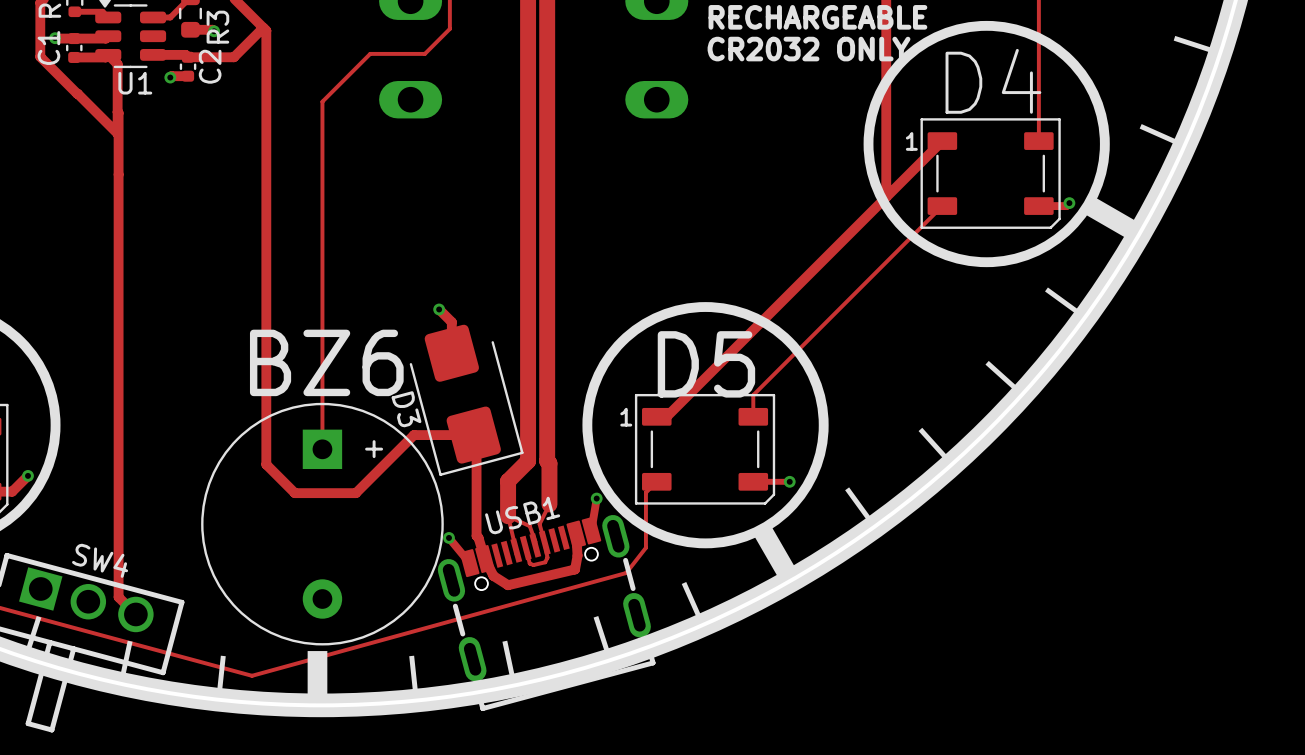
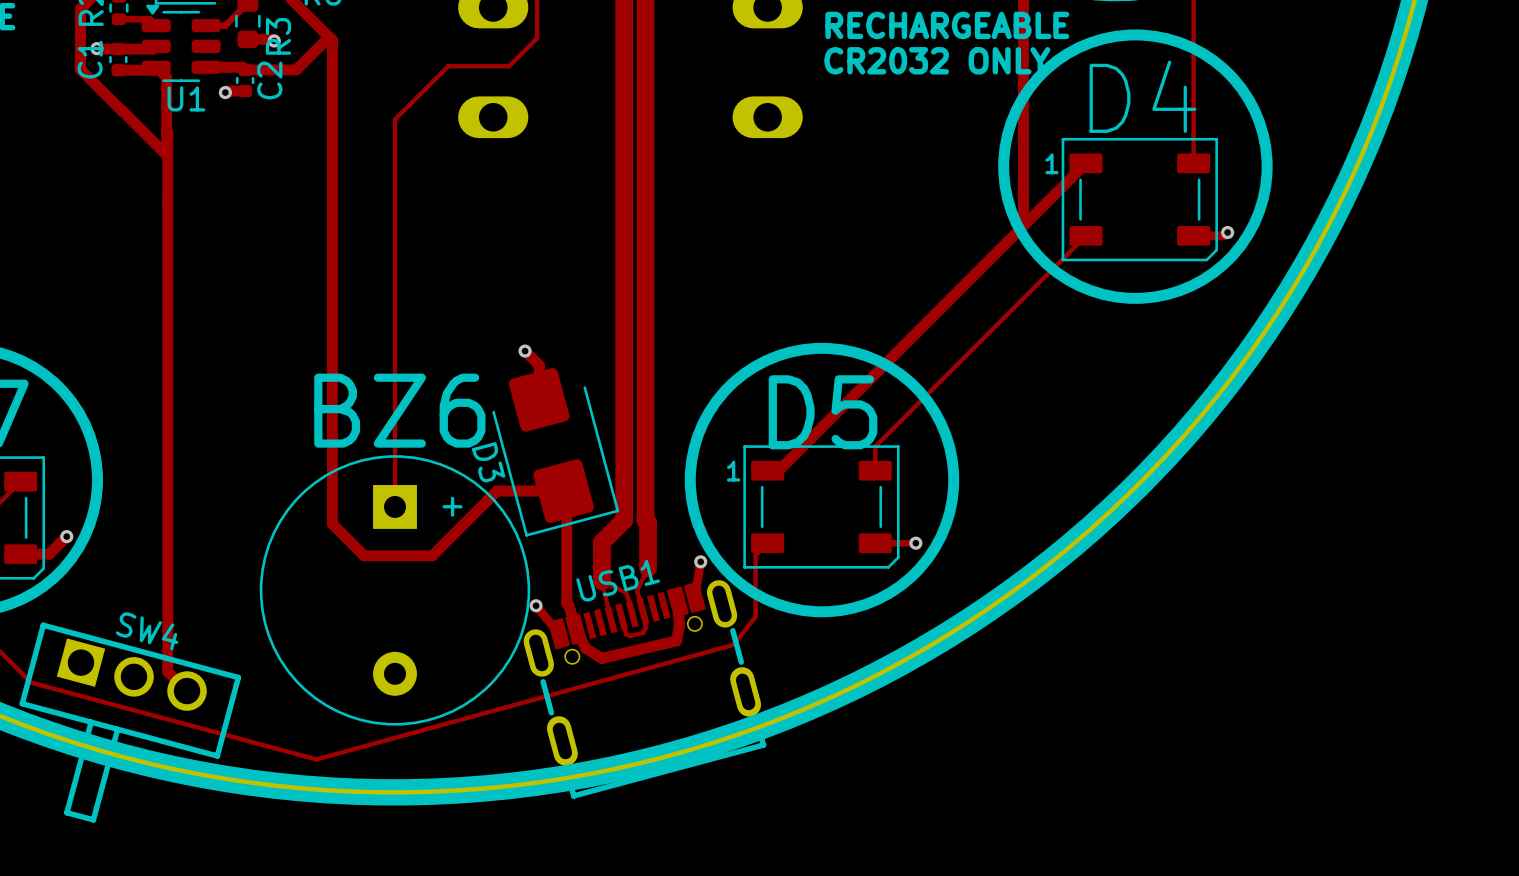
drawing: [1173, 35, 1213, 53] -> none
drawing: [1139, 124, 1178, 145] -> none
drawing: [1084, 196, 1137, 239] -> none
drawing: [1045, 287, 1080, 315] -> none
drawing: [985, 360, 1019, 391] -> none
drawing: [918, 427, 949, 461] -> none
drawing: [845, 487, 873, 523] -> none
drawing: [754, 526, 797, 580] -> none
drawing: [681, 581, 703, 620] -> none
drawing: [24, 616, 42, 656] -> none
drawing: [593, 616, 611, 656] -> none
drawing: [119, 640, 133, 681] -> none
drawing: [502, 640, 516, 681] -> none
drawing: [307, 651, 328, 701] -> none
drawing: [216, 655, 226, 696] -> none
drawing: [409, 655, 419, 696] -> none

